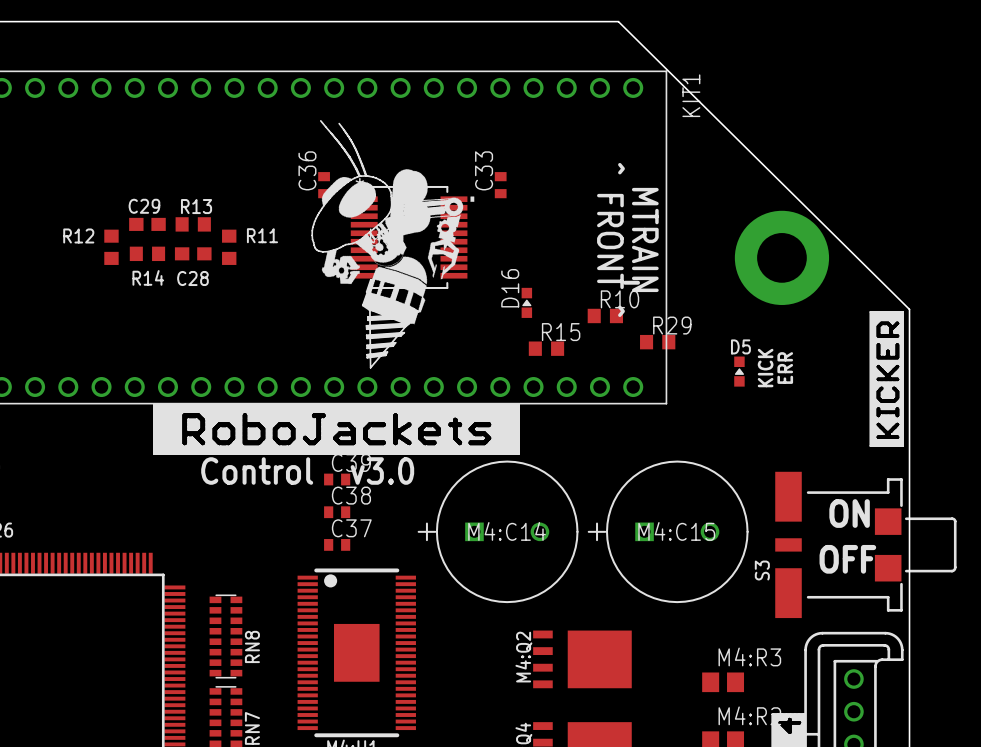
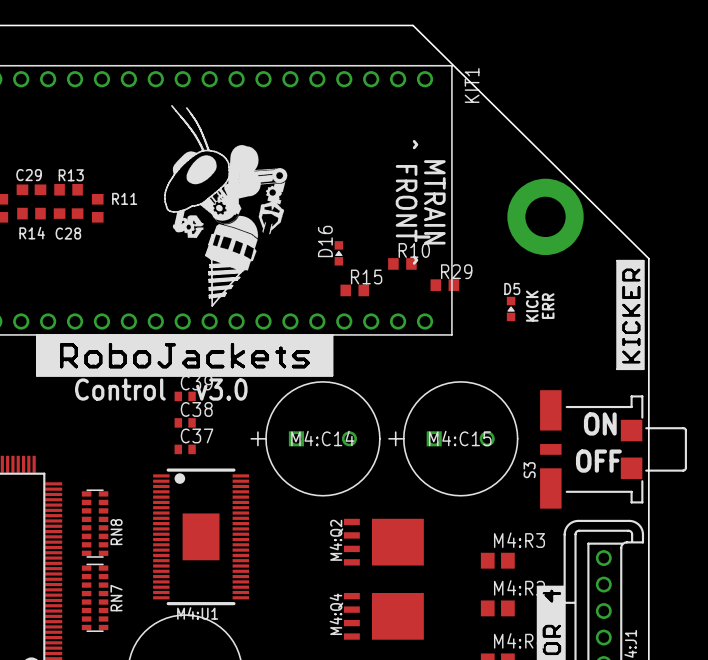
C36: (324, 185) -> none
C33: (500, 185) -> none
part: (409, 237) -> none

